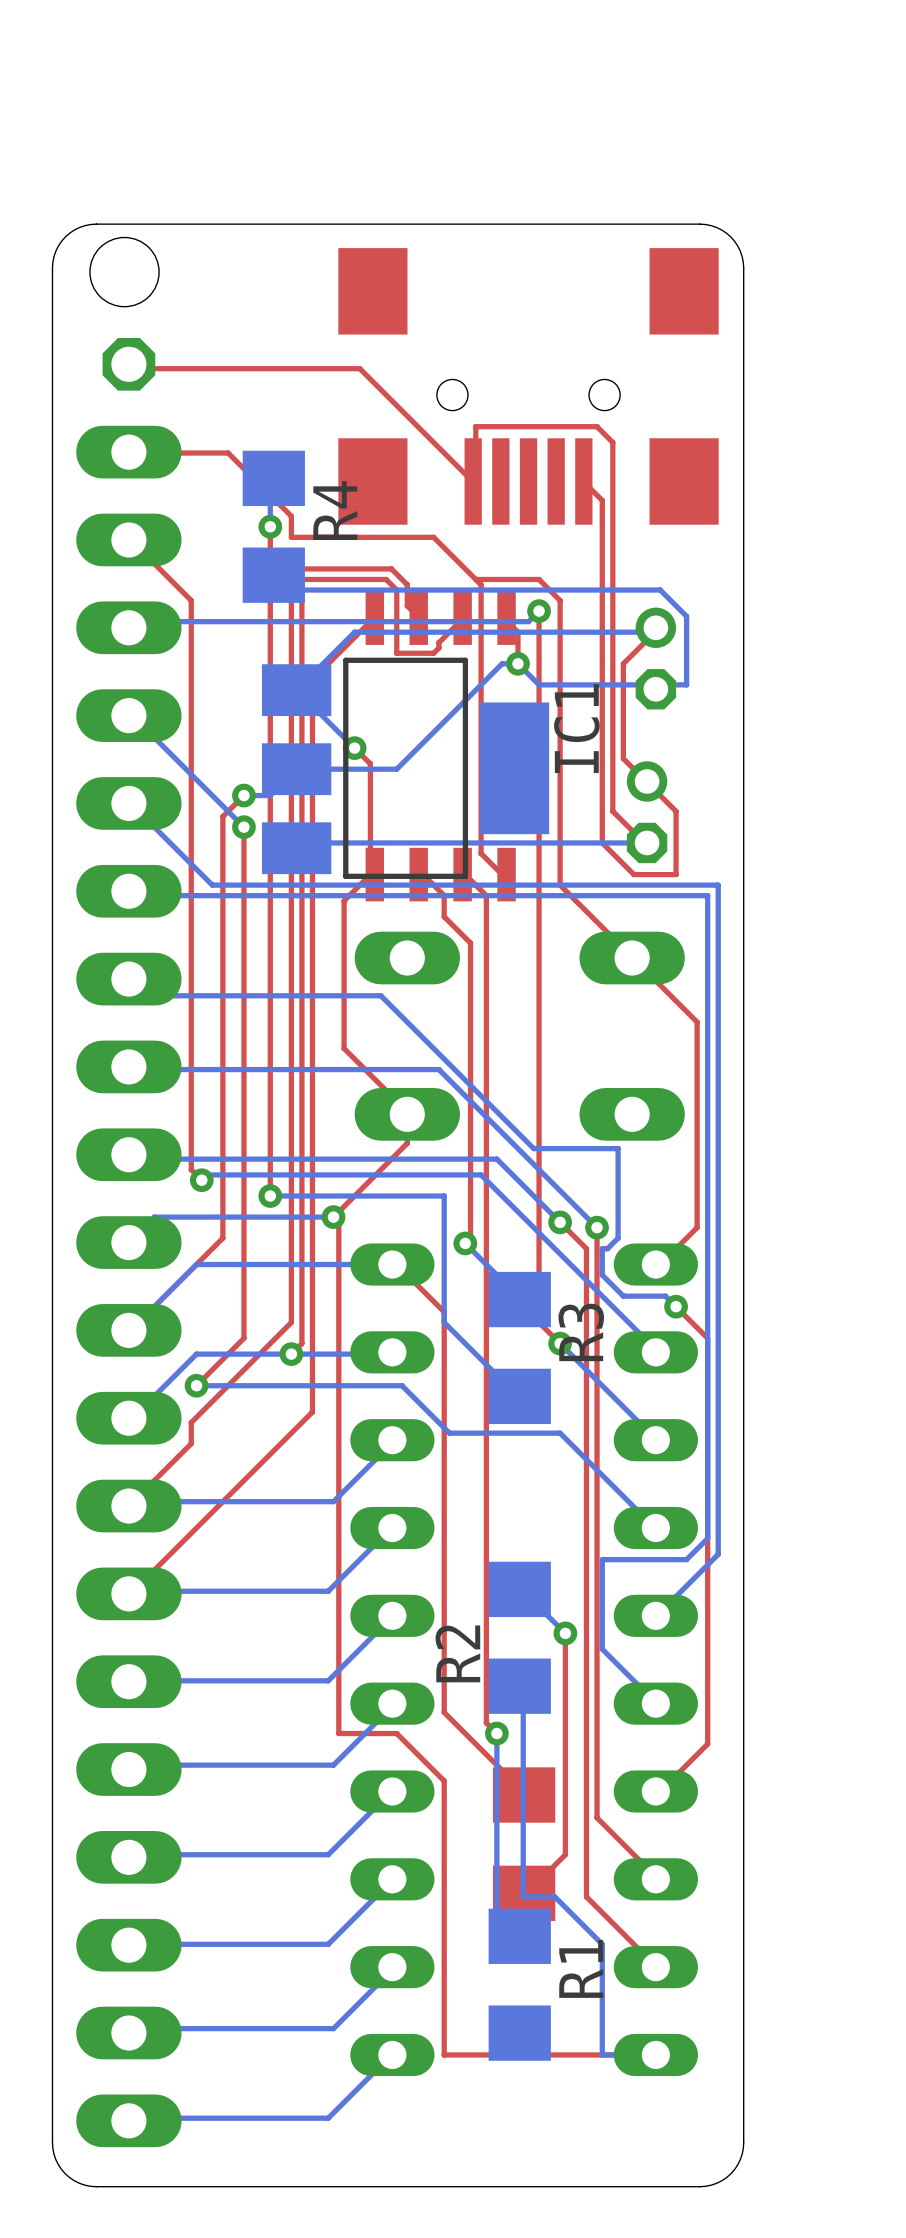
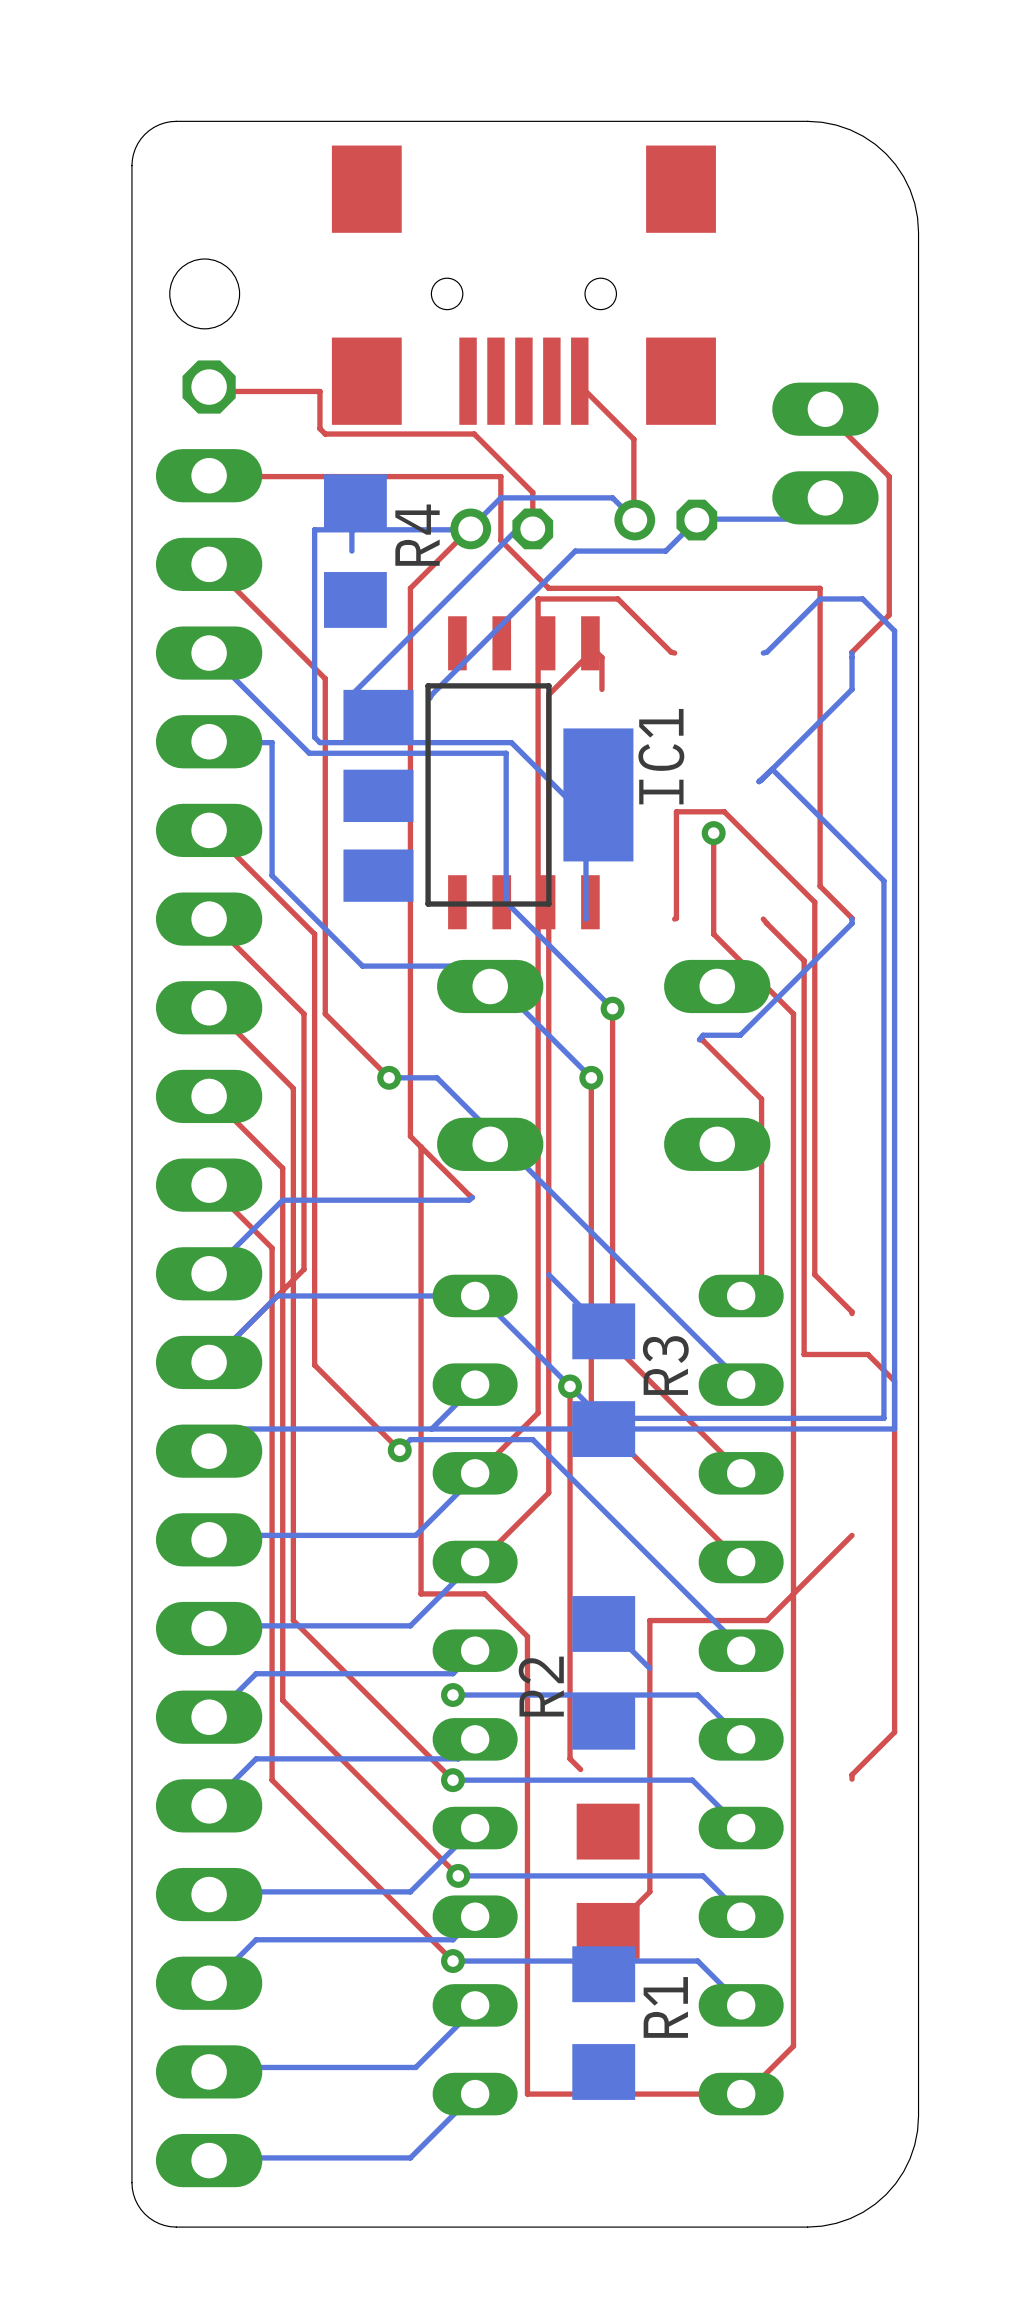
board edge: (52, 268) (55, 251) (65, 237) (79, 227) (96, 224) (699, 224) (711, 225) (726, 233) (737, 246) (742, 256) (743, 2142) (740, 2159) (730, 2173) (716, 2183) (699, 2186) -> (131, 289) (133, 154) (137, 143) (149, 130) (159, 124) (170, 121) (822, 122) (850, 129) (863, 136) (886, 153) (903, 176) (914, 203) (918, 232) (918, 2116) (914, 2144) (910, 2158) (895, 2183) (875, 2204) (863, 2212) (836, 2223) (822, 2226) (785, 2227)
top track: none -> (579, 381) (580, 386) (633, 439) (634, 520)
top track: (238, 368) (359, 368) (473, 481) (475, 479) (475, 426) (597, 426) (612, 442) (612, 811) (644, 842) (647, 842) -> (319, 391) (319, 428) (325, 434) (474, 434) (532, 492) (532, 528)
part position: (528, 386) -> (523, 285)
top track: none -> (825, 409) (825, 412) (889, 476) (889, 614) (852, 653)
part: none -> (825, 453)
top track: (228, 453) (291, 516) (291, 537) (433, 537) (481, 584) (481, 853) (502, 874) (506, 874) -> (309, 476) (500, 476) (500, 540) (548, 588) (820, 588) (820, 886) (852, 919)
bottom track: none -> (825, 497) (804, 519) (697, 519) (665, 551) (575, 551) (429, 698)
top track: (583, 481) (602, 500) (602, 842) (633, 874) (676, 874) (676, 811) (623, 758) (623, 663) (654, 632) (655, 627) -> none
bottom track: none -> (634, 520) (612, 497) (500, 497) (468, 529) (314, 529) (314, 737) (319, 742) (511, 742) (585, 817) (585, 919)
part: none -> (665, 520)
top track: none -> (470, 528) (410, 588) (410, 1136) (472, 1197)
part: none -> (501, 528)
bottom track: none -> (532, 528) (516, 529) (350, 698)
top track: (270, 526) (270, 1196) -> none
via: (270, 526) -> none
bottom track: (273, 575) (286, 590) (660, 590) (686, 616) (686, 684) (660, 684) (655, 689) (654, 684) (539, 684) (517, 663) (502, 663) (396, 769) (296, 769) (270, 795) (243, 795) -> none
top track: (539, 579) (475, 579) -> (623, 604) (617, 598) (538, 598) (538, 1413) (479, 1471) (475, 1473)
top track: (191, 600) (191, 1169) (201, 1180) -> (272, 625) (325, 678) (325, 854)
top track: (560, 600) (560, 885) (697, 1022) (697, 1227) (676, 1248) -> (699, 1039) (703, 1040) (761, 1099) (761, 1280)
top track: none -> (644, 625) (671, 652) (674, 653)
bottom track: (539, 611) (528, 621) (138, 621) (133, 626) (128, 627) -> (612, 1008) (506, 902) (506, 753) (309, 753) (209, 653)
top track: (539, 611) (539, 1322) -> (612, 1008) (612, 1343) (623, 1354)
via: (539, 611) -> none
top track: (374, 618) (312, 679) (312, 1412) (128, 1593) -> none
top track: (418, 618) (407, 605) (407, 584) (391, 568) (291, 568) (291, 1322) (191, 1422) -> (209, 1185) (272, 1248) (272, 1455)
top track: (462, 618) (438, 642) (438, 647) (433, 653) (396, 653) (396, 590) (386, 579) (301, 579) (301, 1343) (291, 1354) -> none
top track: none -> (585, 653) (585, 657) (548, 694) (548, 1492) (479, 1562) (475, 1562)
bottom track: (655, 627) (654, 632) (354, 632) (296, 690) (354, 748) -> none
bottom track: none -> (763, 653) (766, 652) (820, 598) (862, 598) (894, 630) (894, 1428) (234, 1428)
bottom track: none -> (852, 653) (852, 689) (759, 781) (772, 769) (883, 880) (883, 1418) (601, 1418) (479, 1295) (475, 1295)
part: (655, 658) -> none
via: (517, 663) -> none
bottom track: (133, 716) (243, 827) -> (213, 742) (272, 742) (272, 875) (362, 966) (479, 966) (591, 1077)
top track: (354, 748) (370, 763) (370, 874) -> none
via: (354, 748) -> none
top track: (243, 795) (222, 816) (222, 985) -> (209, 919) (304, 1013)
via: (243, 795) -> none
bottom track: (128, 803) (212, 885) (718, 885) (718, 1554) (655, 1615) -> (399, 1450) (410, 1439) (532, 1439) (740, 1647) (741, 1650)
top track: none -> (209, 830) (314, 934) (314, 1365) (399, 1450)
via: none -> (713, 833)
part: (647, 812) -> none
via: (243, 827) -> none
bottom track: (647, 842) (301, 842) (296, 848) -> none
top track: (370, 874) (344, 900) (344, 1048) (407, 1111) (407, 1143) (333, 1217) -> none
top track: (418, 874) (423, 874) (444, 895) (444, 916) (470, 943) (470, 1238) (465, 1243) -> none
top track: (462, 874) (465, 874) (486, 895) (486, 1354) -> none
bottom track: (128, 891) (133, 895) (707, 895) (707, 1538) (686, 1559) (602, 1559) (602, 1649) (612, 1659) -> (452, 1695) (697, 1695)
top track: none -> (674, 919) (676, 918) (676, 811) (724, 811) (814, 902) (814, 1274) (852, 1313)
top track: none -> (763, 919) (804, 960) (804, 1354) (867, 1354) (894, 1381) (894, 1732) (852, 1774) (852, 1779)
bottom track: none -> (852, 919) (852, 923) (740, 1035) (703, 1035) (699, 1039)
bottom track: (128, 979) (133, 979) (149, 995) (380, 995) (533, 1148) (618, 1148) (618, 1238) (607, 1248) (602, 1248) (602, 1275) (623, 1296) (665, 1296) (676, 1306) -> none
top track: none -> (209, 1007) (213, 1008) (293, 1088) (293, 1620) (452, 1780)
via: none -> (612, 1008)
top track: (243, 985) (243, 1338) (196, 1385) -> (325, 1013) (389, 1077)
via: none -> (389, 1077)
top track: none -> (591, 1077) (591, 1413) (741, 1562)
via: none -> (591, 1077)
bottom track: (128, 1066) (133, 1069) (438, 1069) (597, 1227) -> none
top track: none -> (209, 1096) (282, 1168) (282, 1700) (458, 1875)
top track: none -> (421, 1146) (421, 1242)
bottom track: (128, 1154) (133, 1159) (496, 1159) (560, 1222) -> none
bottom track: (481, 1174) (207, 1174) (201, 1180) -> (564, 1205) (437, 1077) (389, 1077)
via: (201, 1180) -> none
bottom track: (270, 1196) (444, 1196) (444, 1322) (519, 1396) -> none
via: (270, 1196) -> none
bottom track: (333, 1217) (154, 1217) -> (472, 1197) (468, 1200) (282, 1200) (234, 1248)
via: (333, 1217) -> none
top track: (560, 1222) (586, 1248) (586, 1896) (655, 1967) -> none
via: (560, 1222) -> none
top track: (597, 1227) (597, 1817) (654, 1875) (655, 1879) -> none
via: (597, 1227) -> none
via: (465, 1243) -> none
top track: (392, 1264) (396, 1264) (444, 1311) (444, 1601) -> none
top track: (676, 1306) (707, 1338) -> (713, 833) (713, 934) (793, 1013) (793, 1370)
via: (676, 1306) -> none
bottom track: (560, 1343) (655, 1440) -> none
top track: none -> (644, 1375) (741, 1473)
via: (560, 1343) -> none
via: (291, 1354) -> none
bottom track: (391, 1354) (196, 1354) (154, 1396) -> (474, 1386) (431, 1428)
via: none -> (570, 1386)
bottom track: (196, 1385) (402, 1385) (449, 1433) (560, 1433) (655, 1528) -> none
via: (196, 1385) -> none
via: none -> (399, 1450)
top track: (191, 1443) (128, 1506) -> (272, 1476) (272, 1780) (452, 1961)
top track: none -> (852, 1535) (766, 1620) (649, 1620) (649, 1668)
top track: (338, 1559) (338, 1733) (396, 1733) (444, 1780) -> (421, 1593) (484, 1593) (527, 1636)
via: (565, 1633) -> none
bottom track: (370, 1638) (328, 1680) (133, 1680) -> (452, 1673) (256, 1673) (213, 1716)
via: none -> (452, 1695)
bottom track: (519, 1686) (523, 1691) (523, 1896) (554, 1896) (602, 1944) (602, 2054) (655, 2054) -> none
top track: (444, 1712) (523, 1791) (524, 1795) -> (527, 1748) (527, 1817)
bottom track: (375, 1722) (333, 1765) (133, 1765) -> (458, 1758) (256, 1758) (213, 1801)
bottom track: (496, 1733) (496, 1933) (517, 1933) (519, 1936) -> none
via: (496, 1733) -> none
bottom track: none -> (452, 1780) (692, 1780) (741, 1828)
via: none -> (452, 1780)
top track: (707, 1744) (660, 1791) (655, 1791) -> (793, 1780) (793, 2046) (745, 2094) (741, 2094)
bottom track: none -> (458, 1875) (703, 1875) (740, 1913) (741, 1916)
via: none -> (458, 1875)
bottom track: (370, 1902) (328, 1944) (133, 1944) -> (452, 1939) (256, 1939) (213, 1982)
bottom track: none -> (452, 1961) (697, 1961) (741, 2005)
via: none -> (452, 1961)

